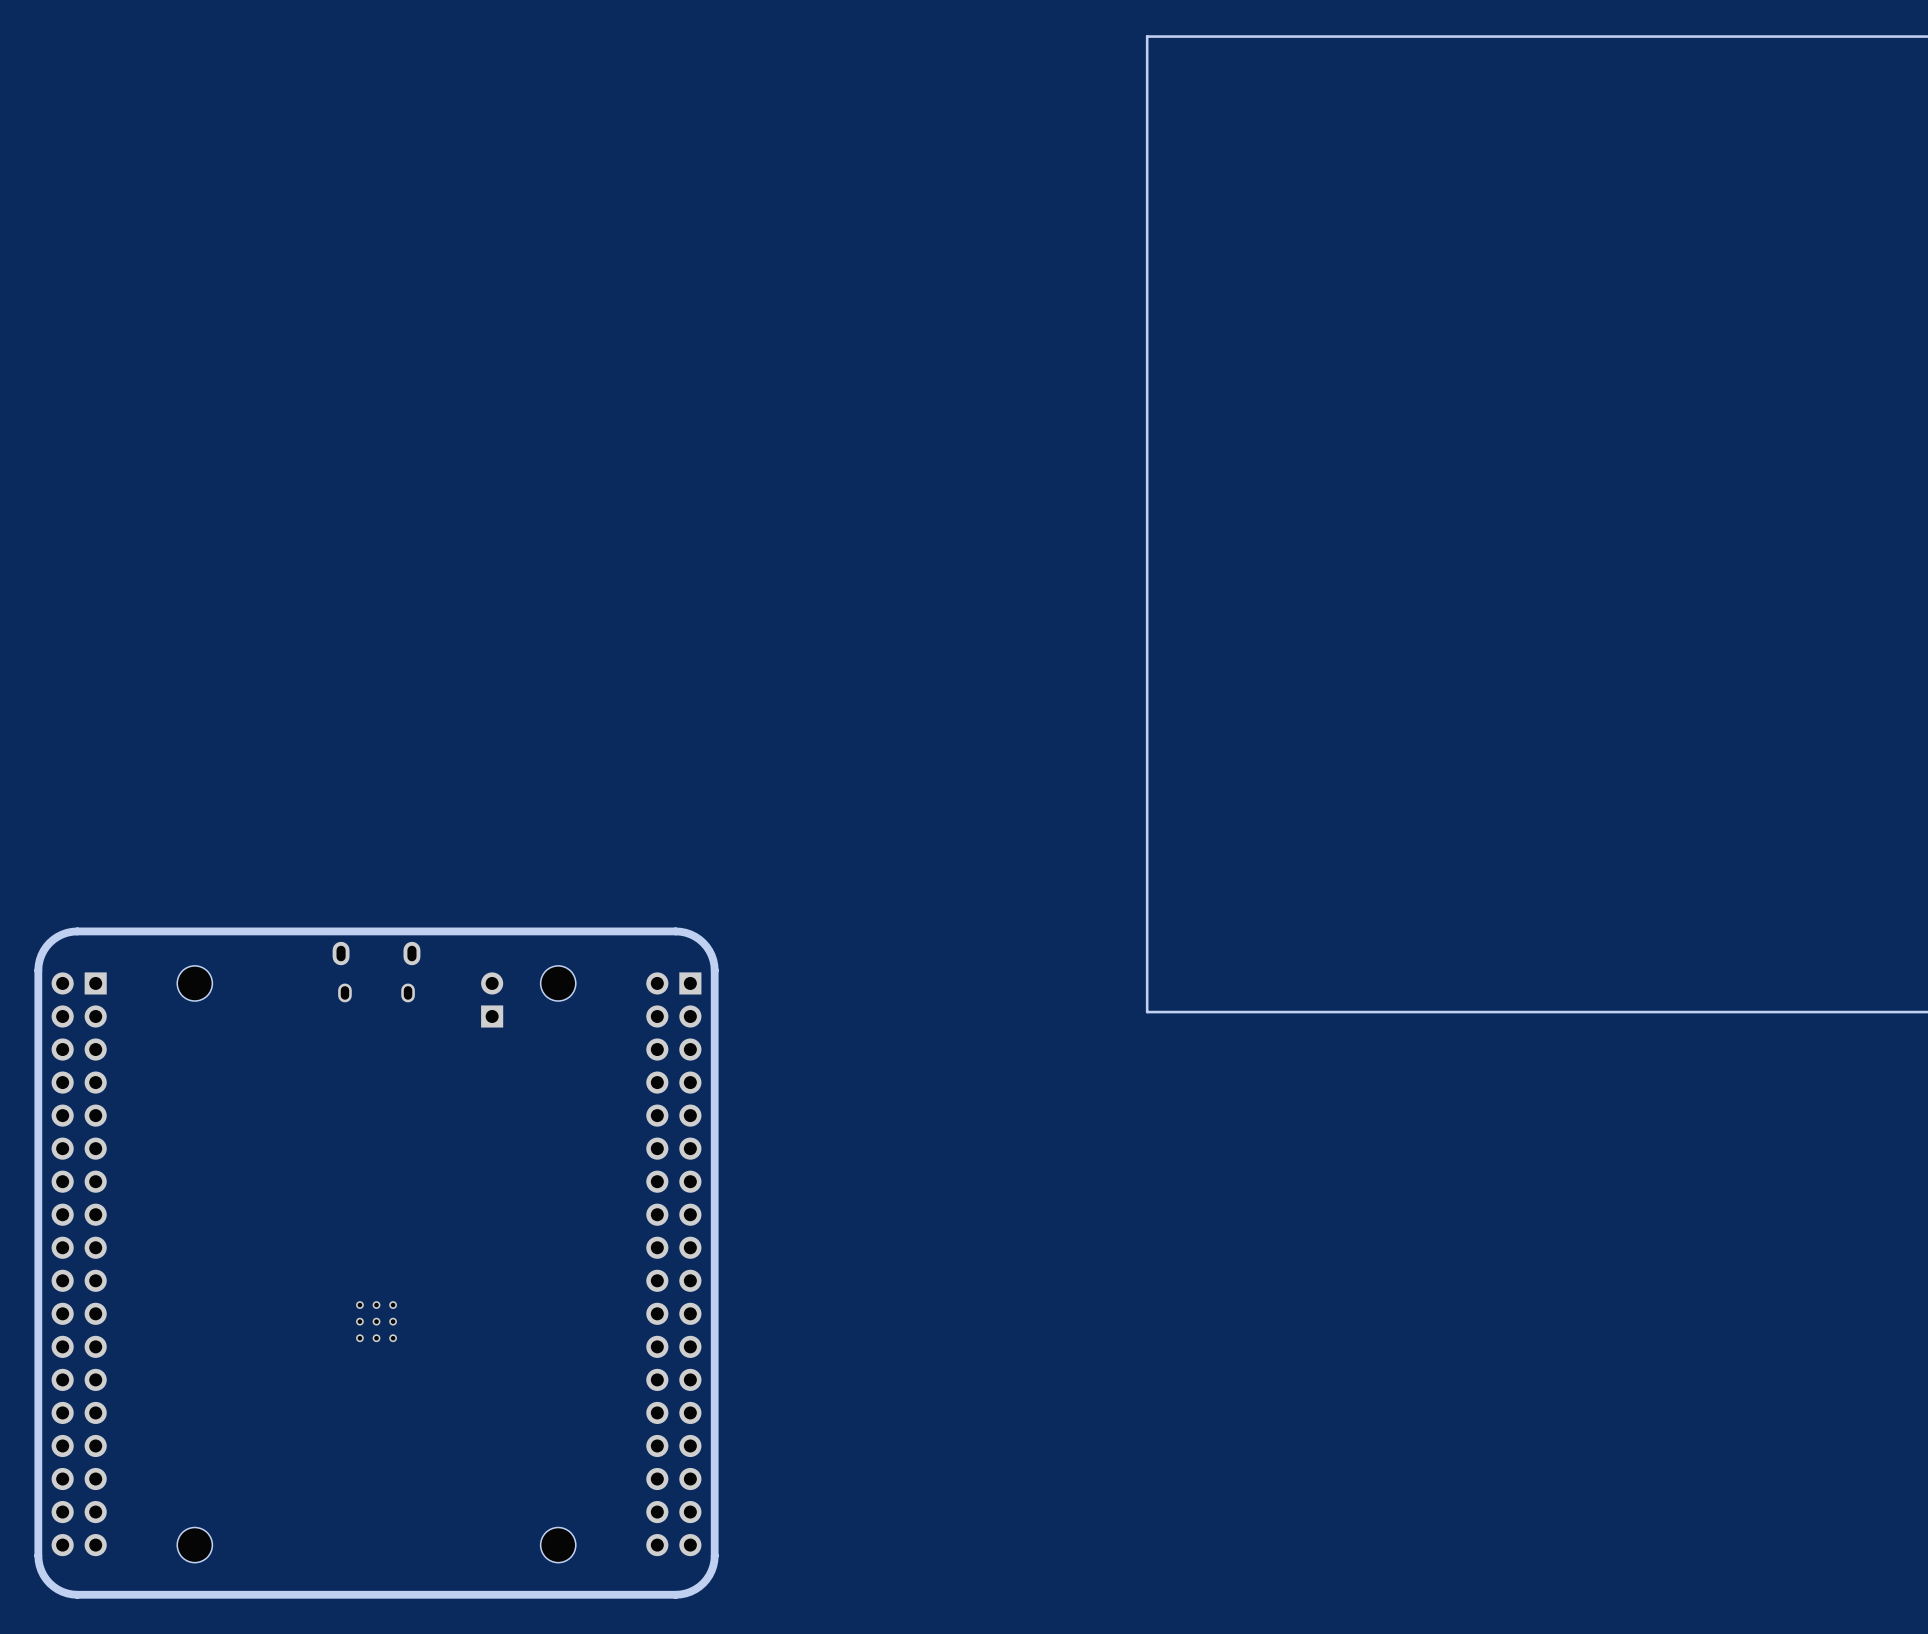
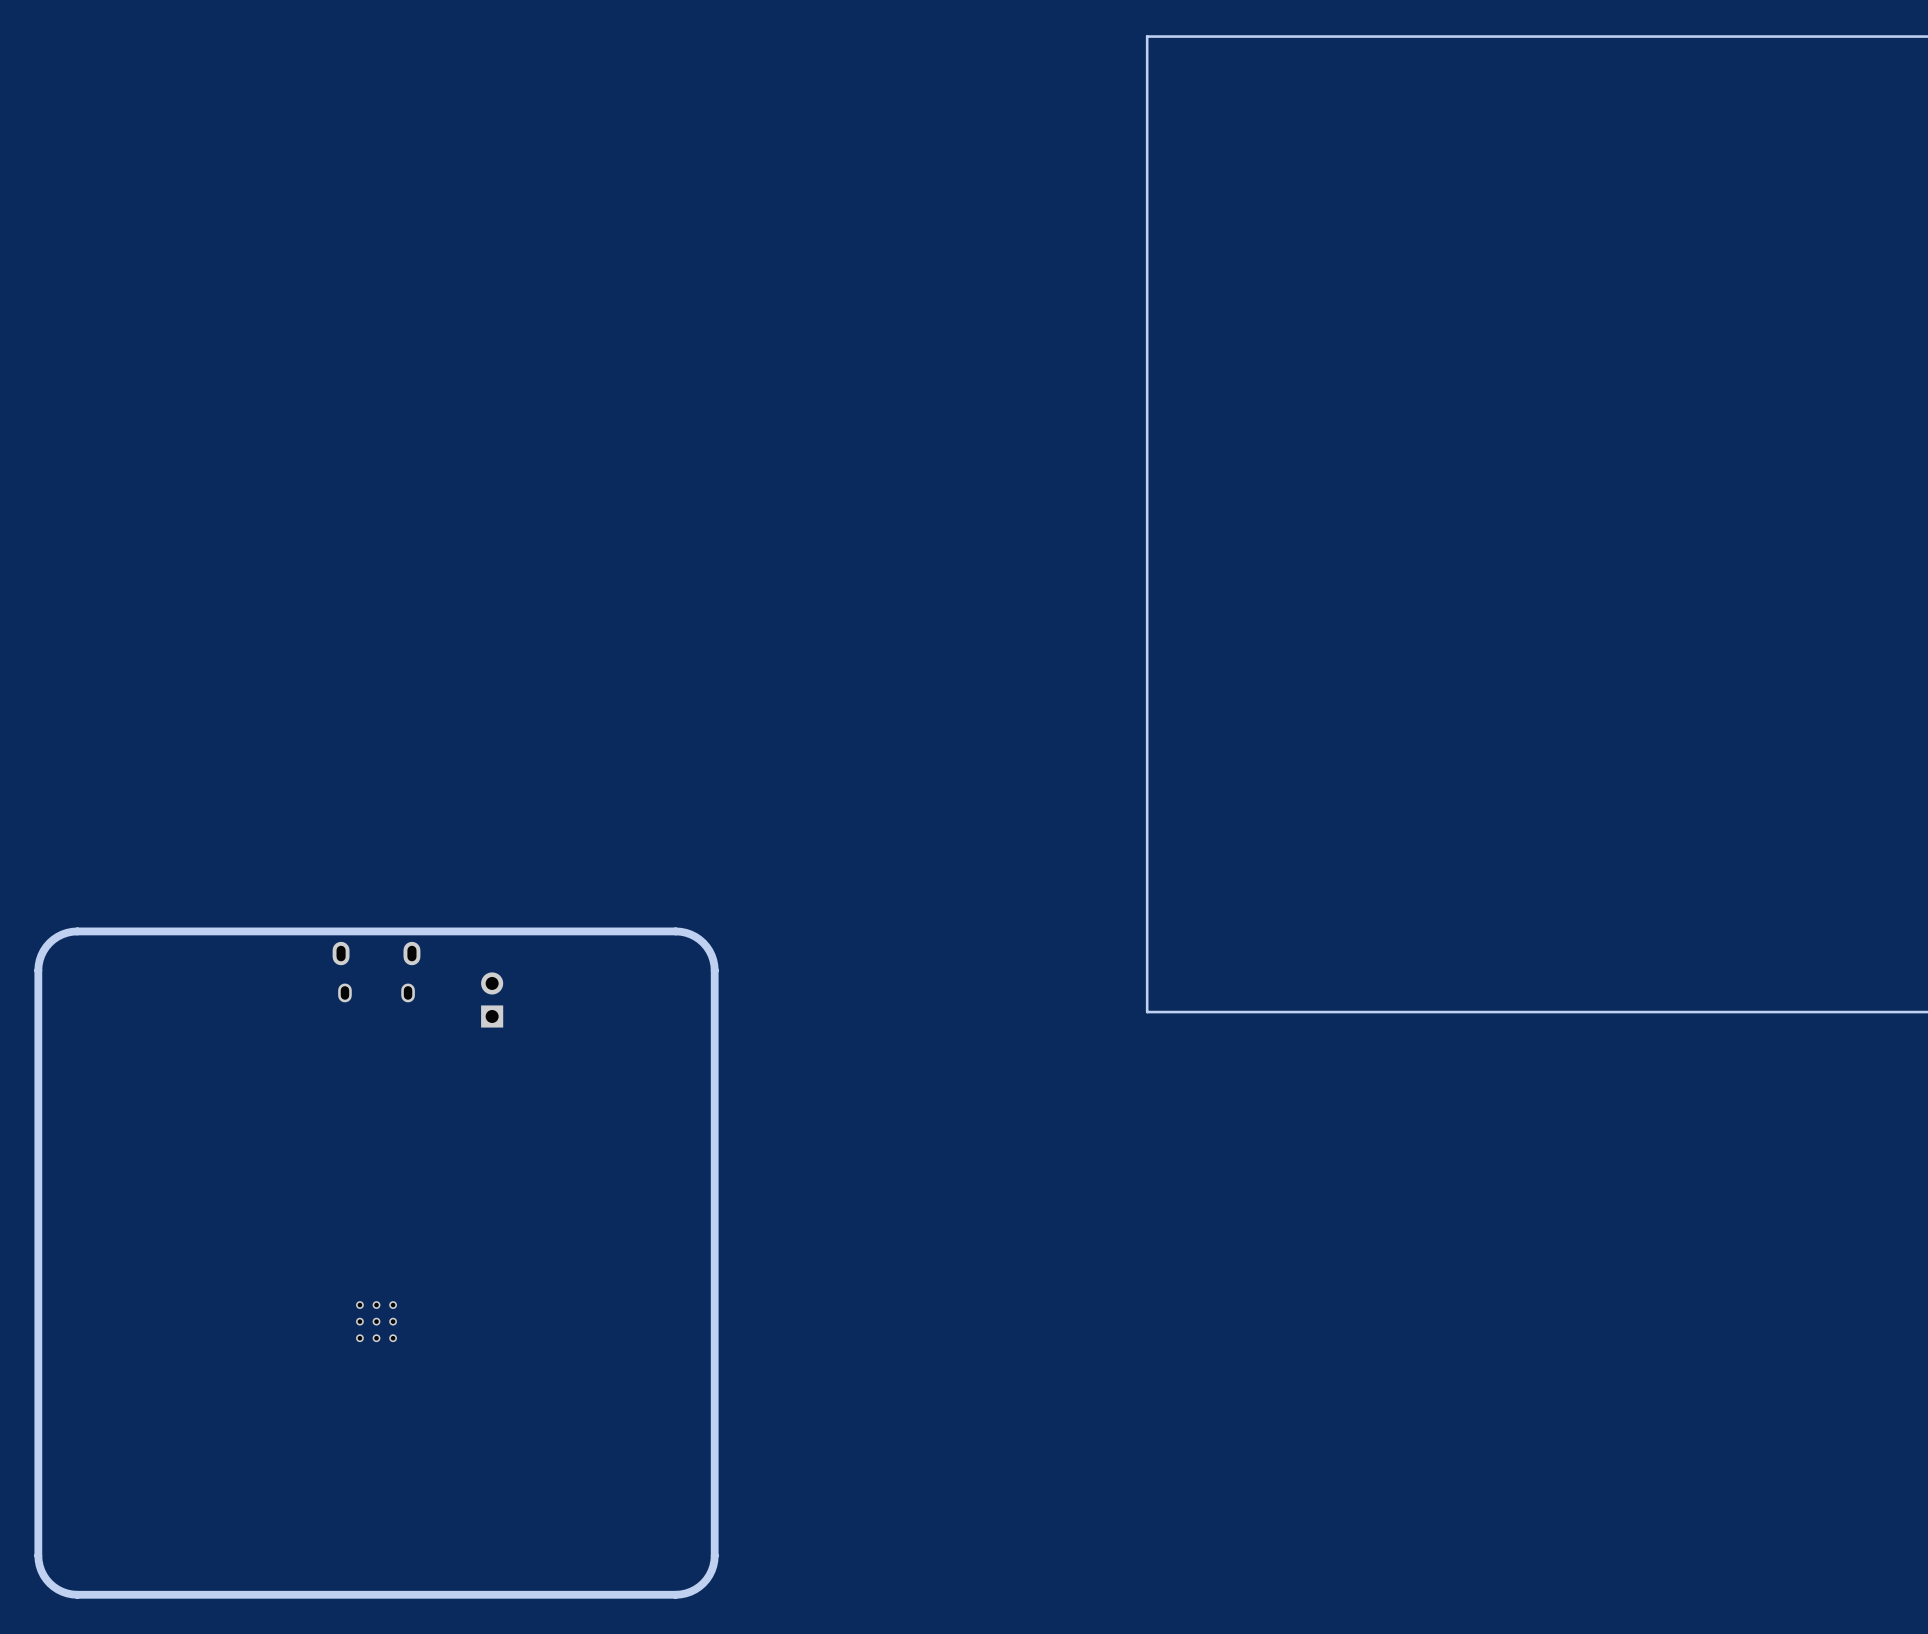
part: (194, 983) -> none
part: (558, 983) -> none
part: (79, 1264) -> none
part: (673, 1264) -> none
part: (194, 1545) -> none
part: (558, 1545) -> none

